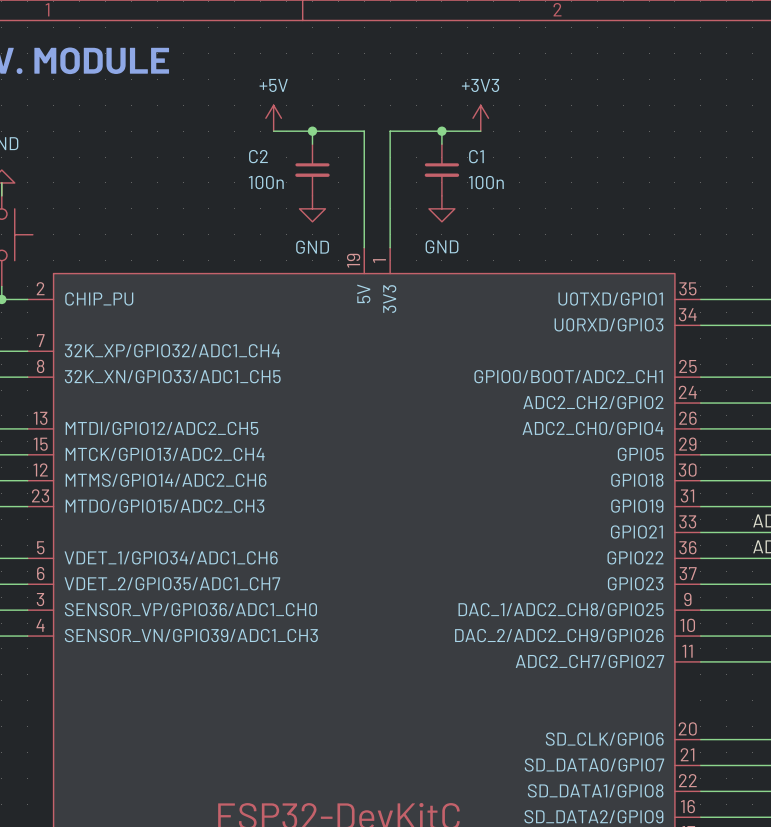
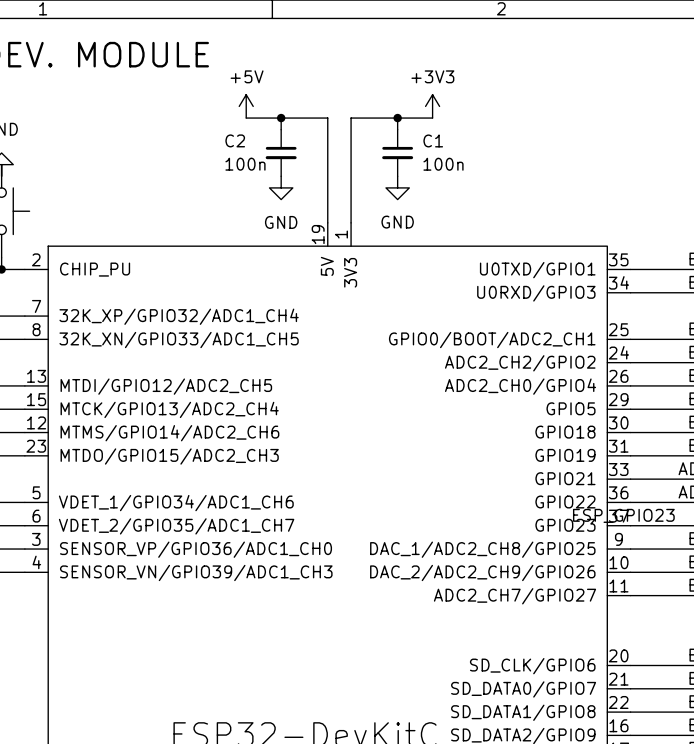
label: none -> ESP_GPIO23 (623, 515)

